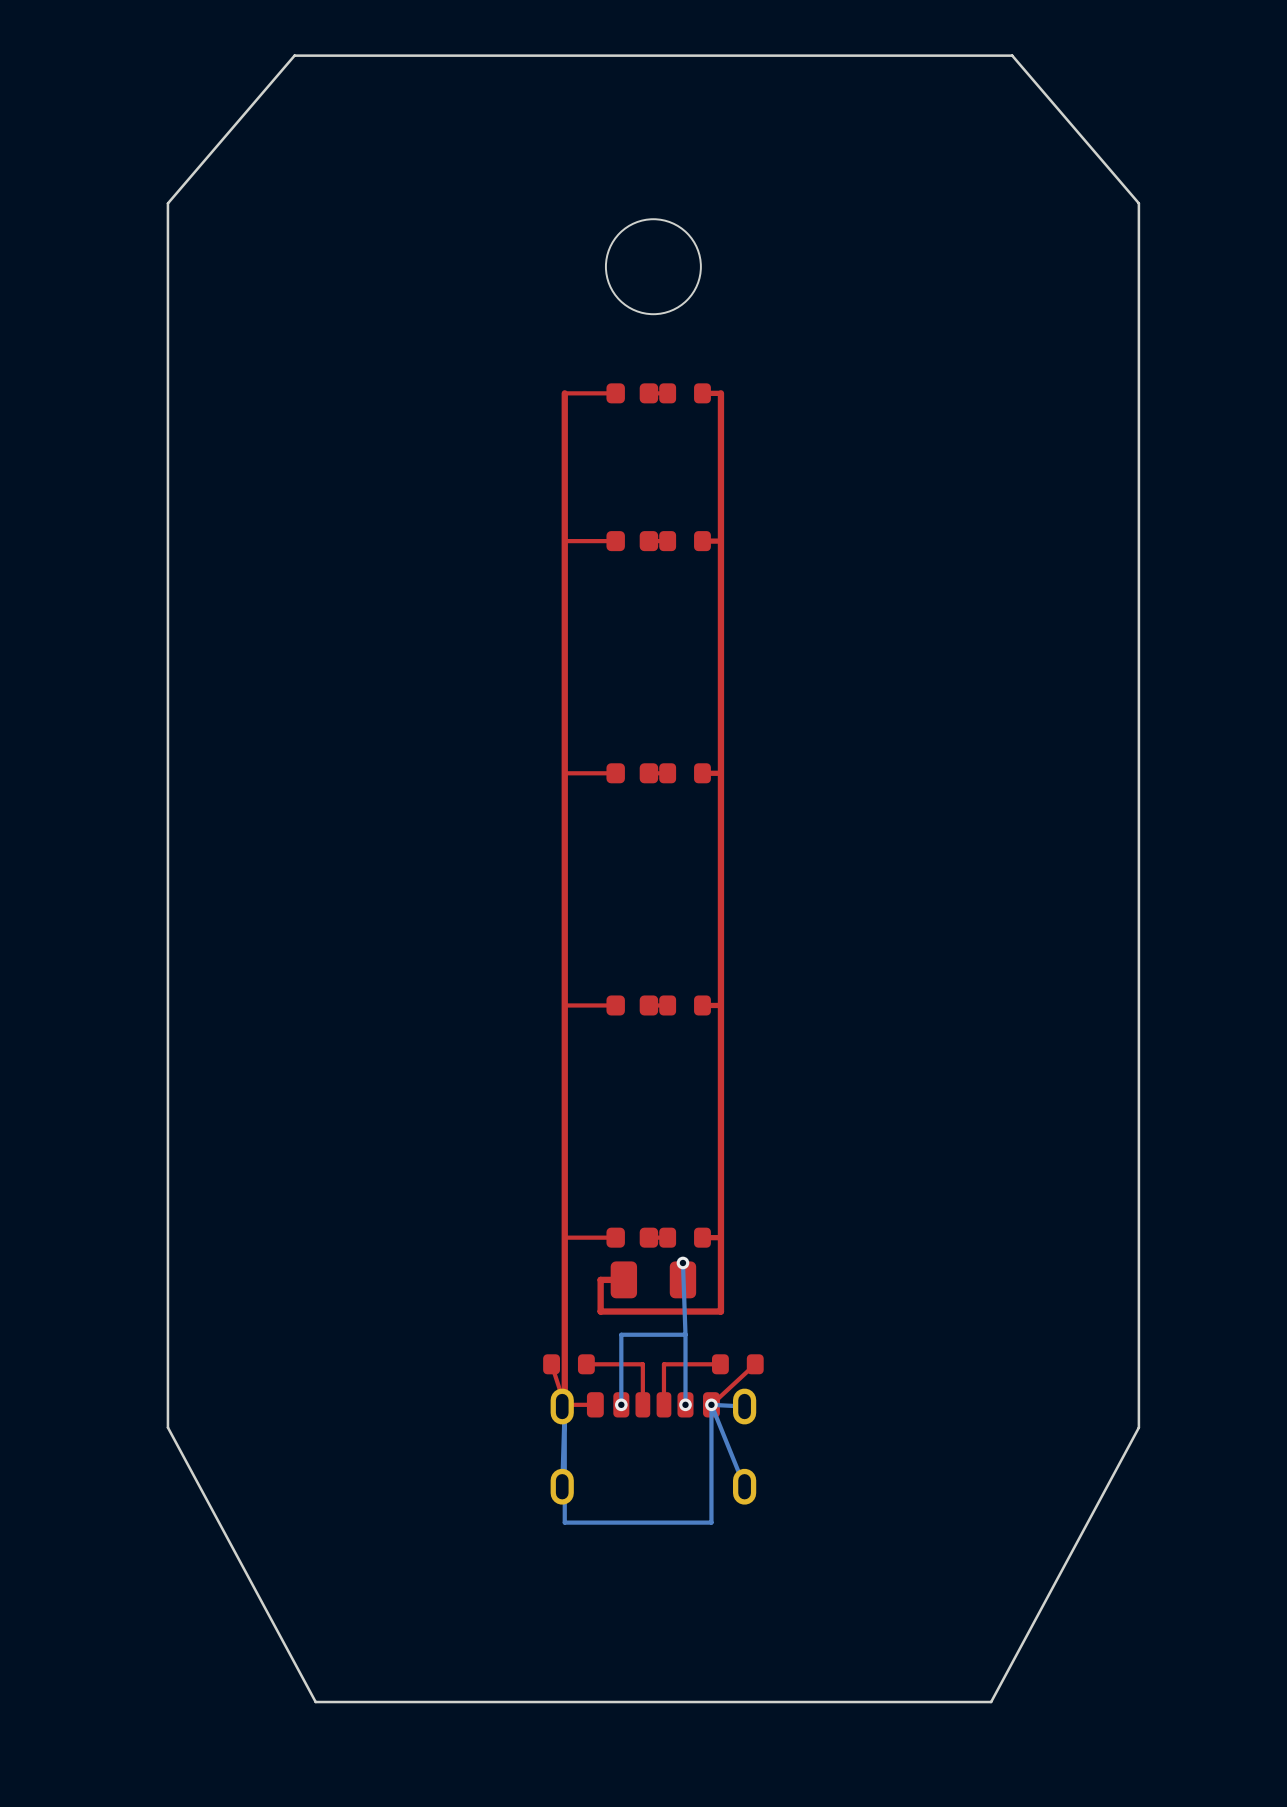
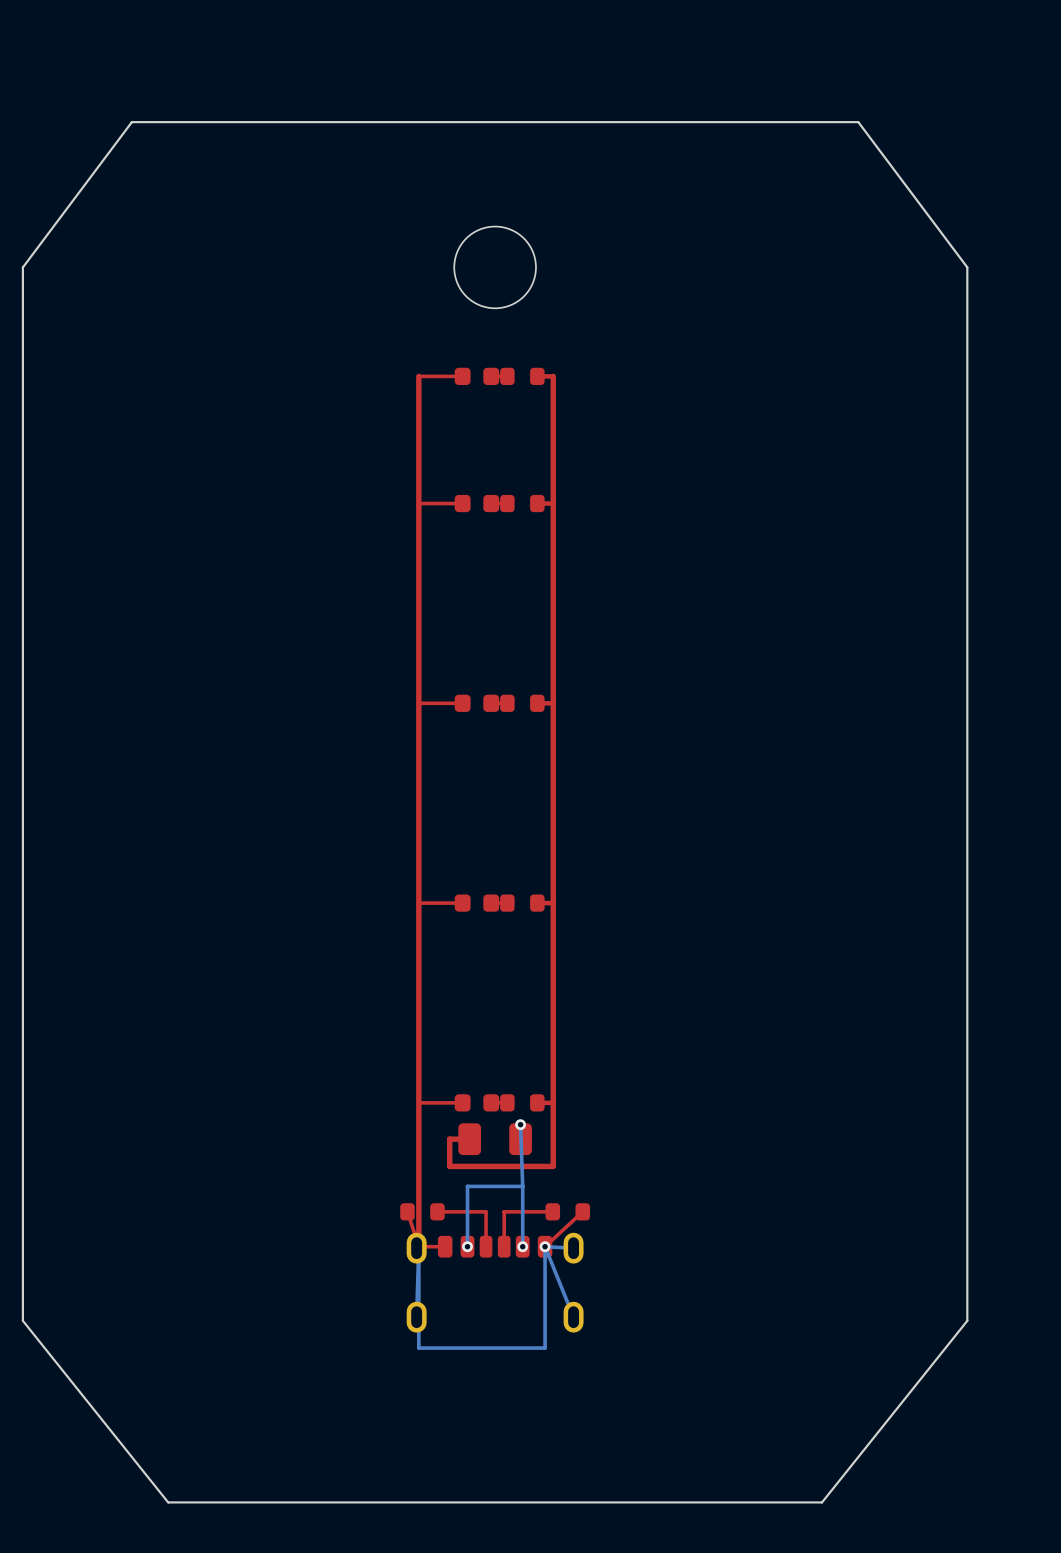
board edge: (991, 1702) (1138, 1427) (1138, 203) (1012, 55) (294, 55) (167, 203) (167, 1427) (315, 1702) -> (785, 1502) (822, 1502) (967, 1320) (967, 267) (858, 122) (131, 122) (22, 267) (22, 1320) (168, 1502) (204, 1502)

